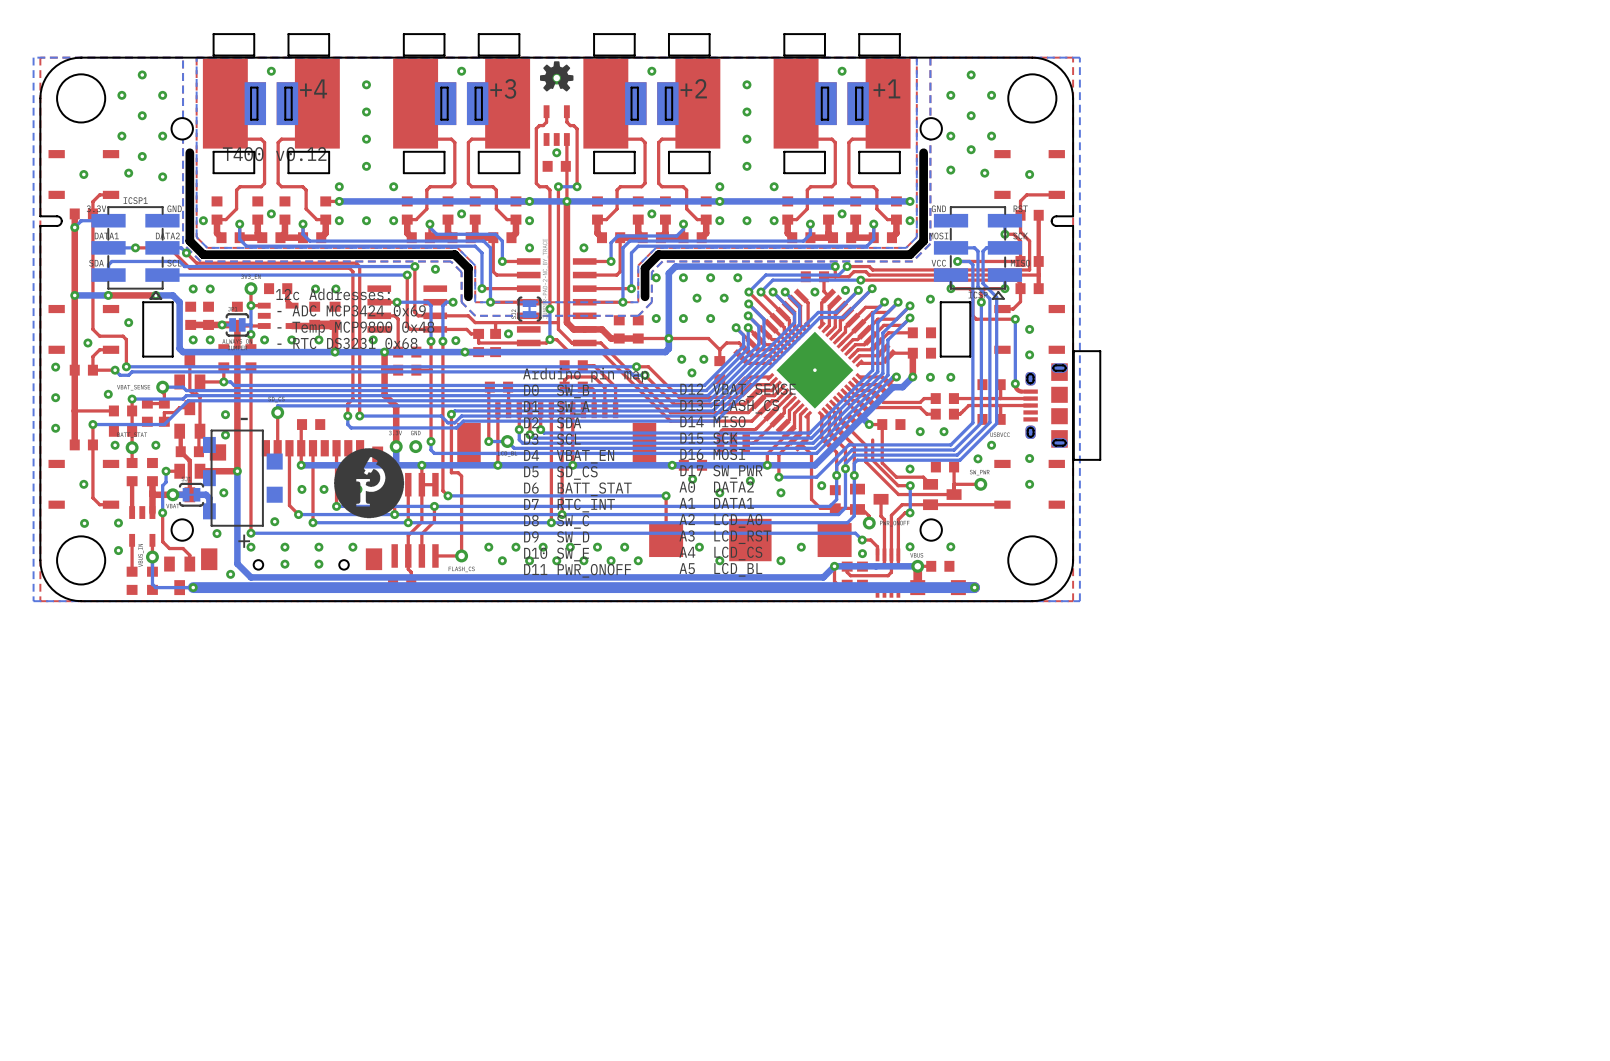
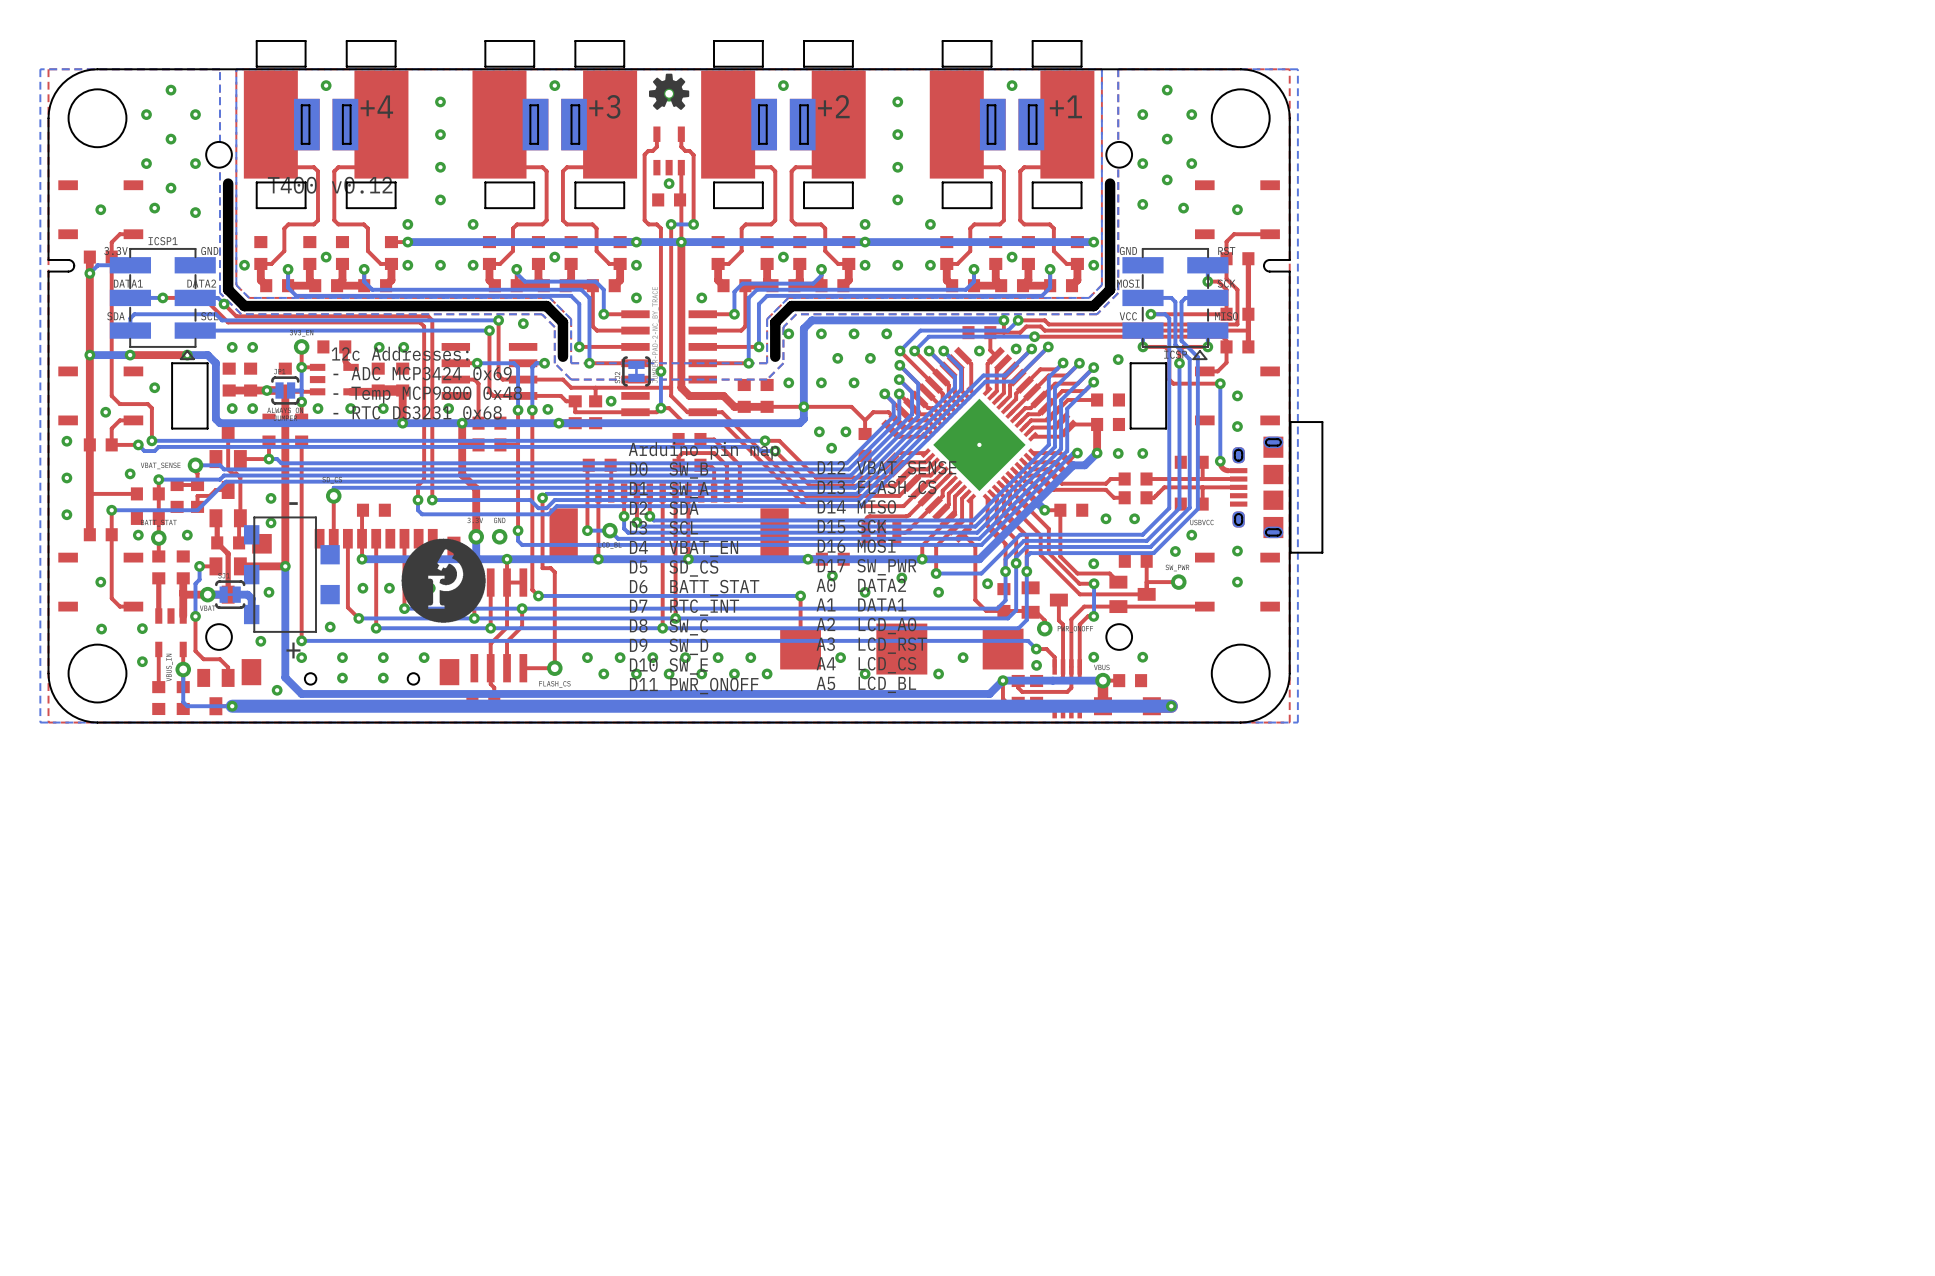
top track: none -> (1005, 480) (1016, 490) (1016, 496) (1048, 528)

